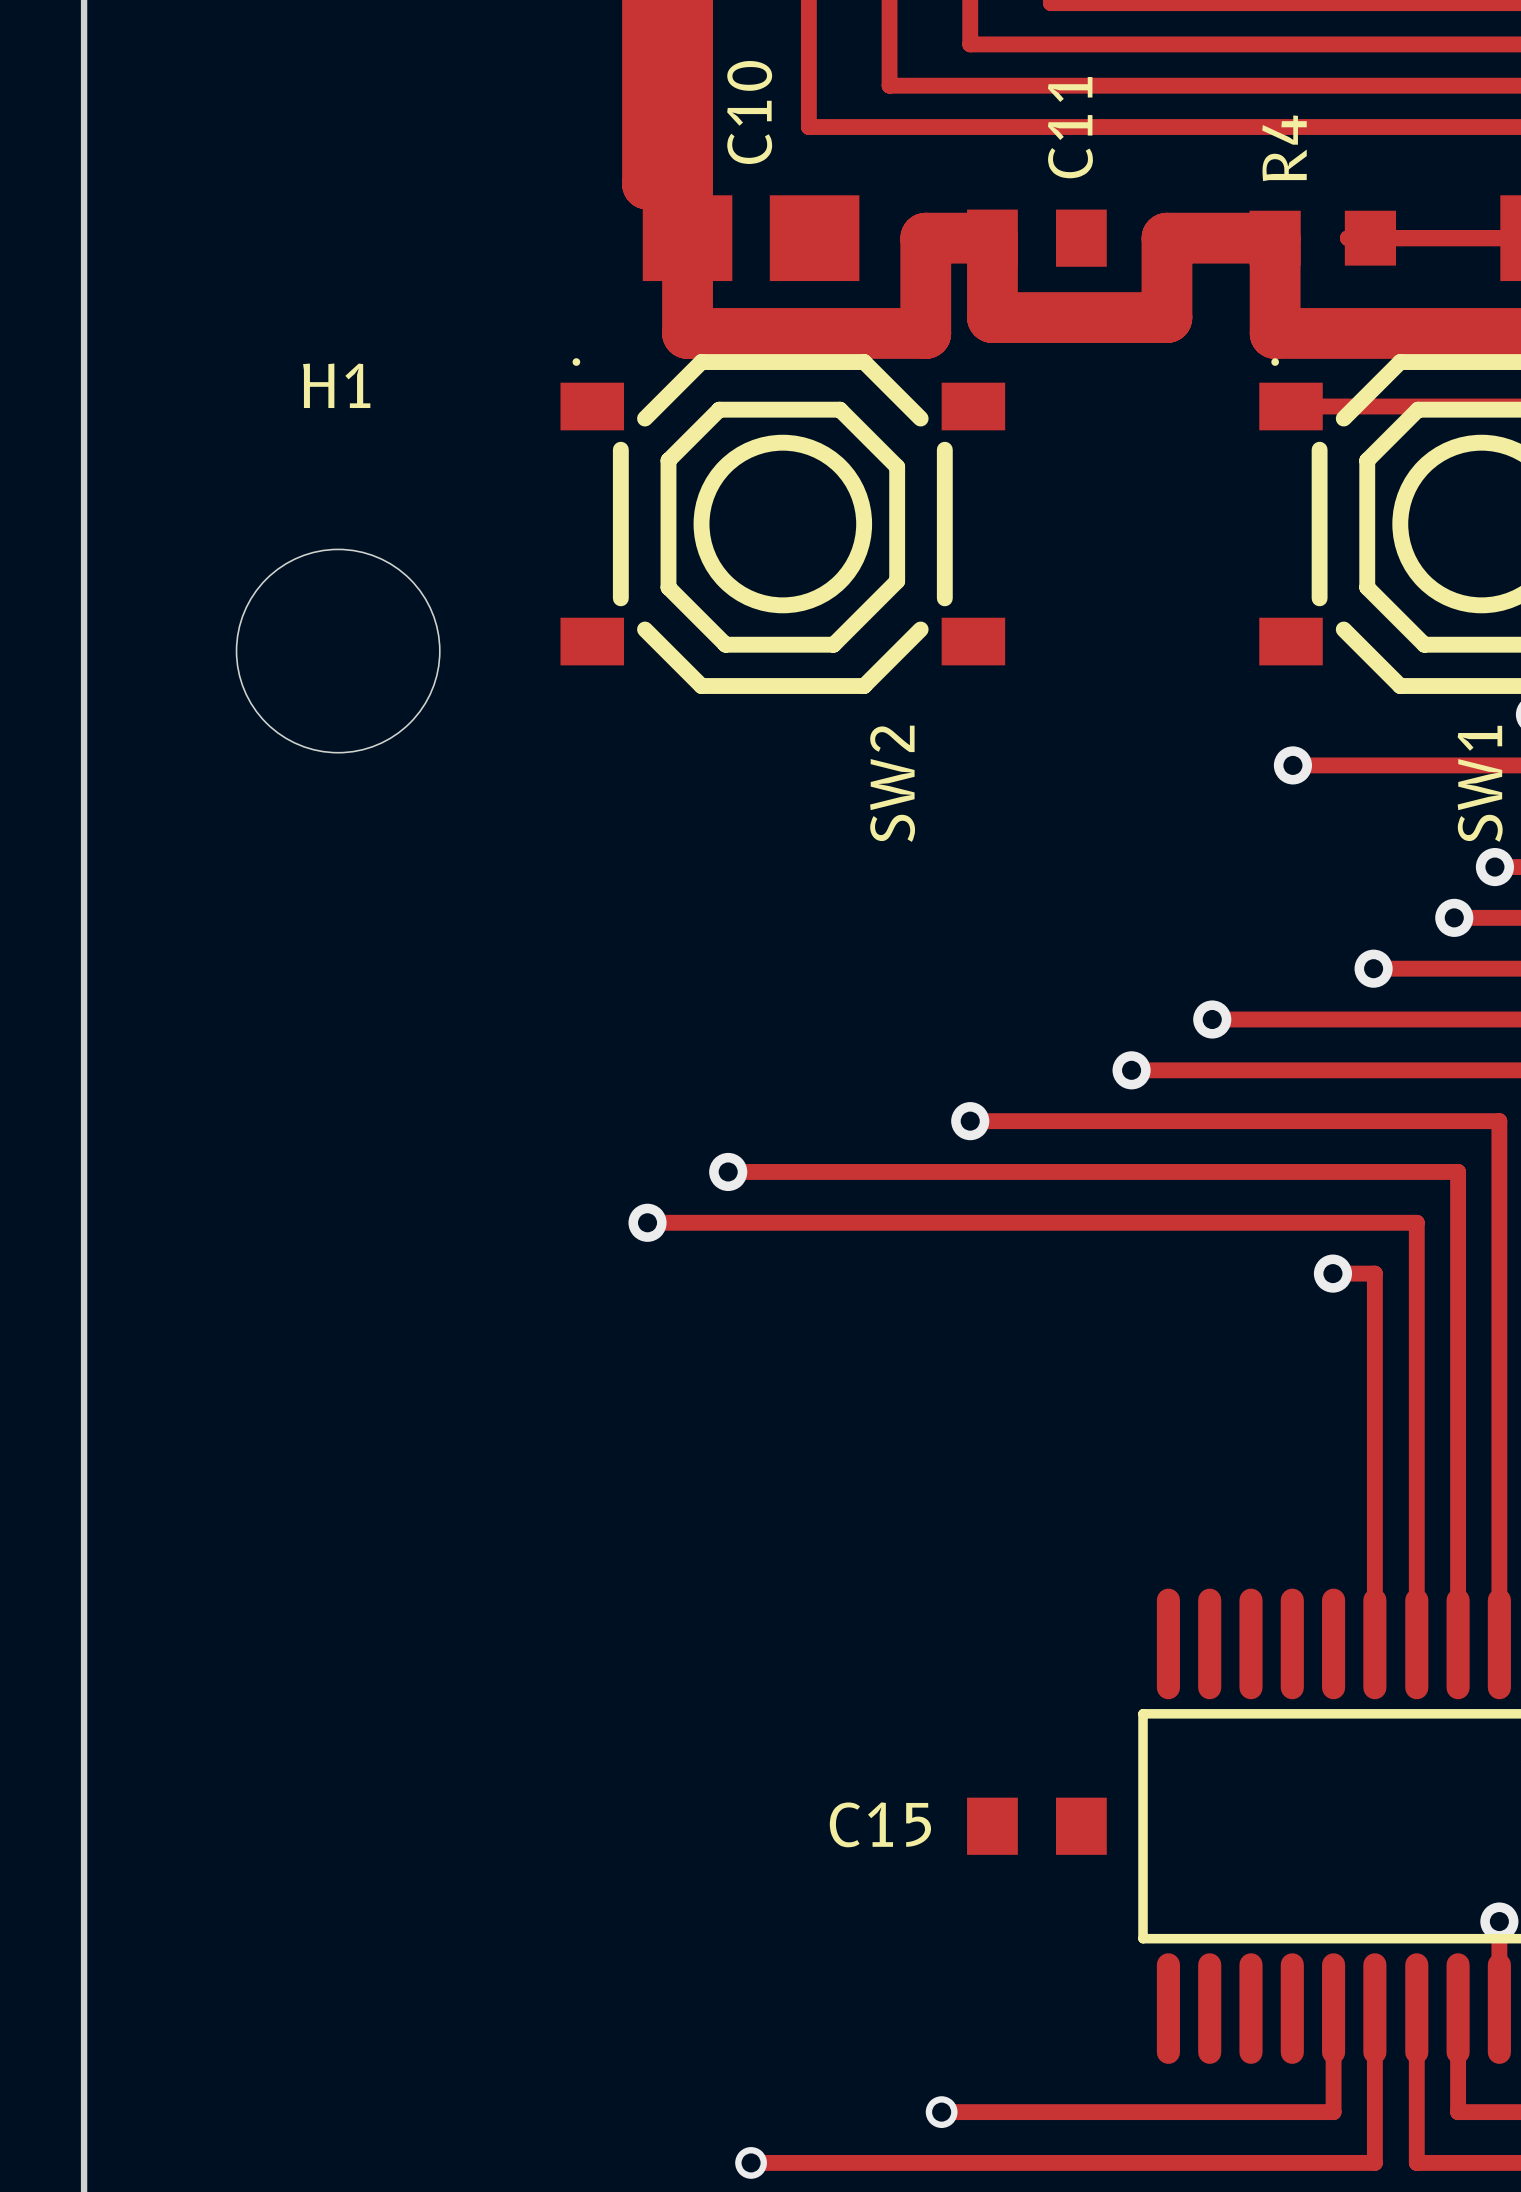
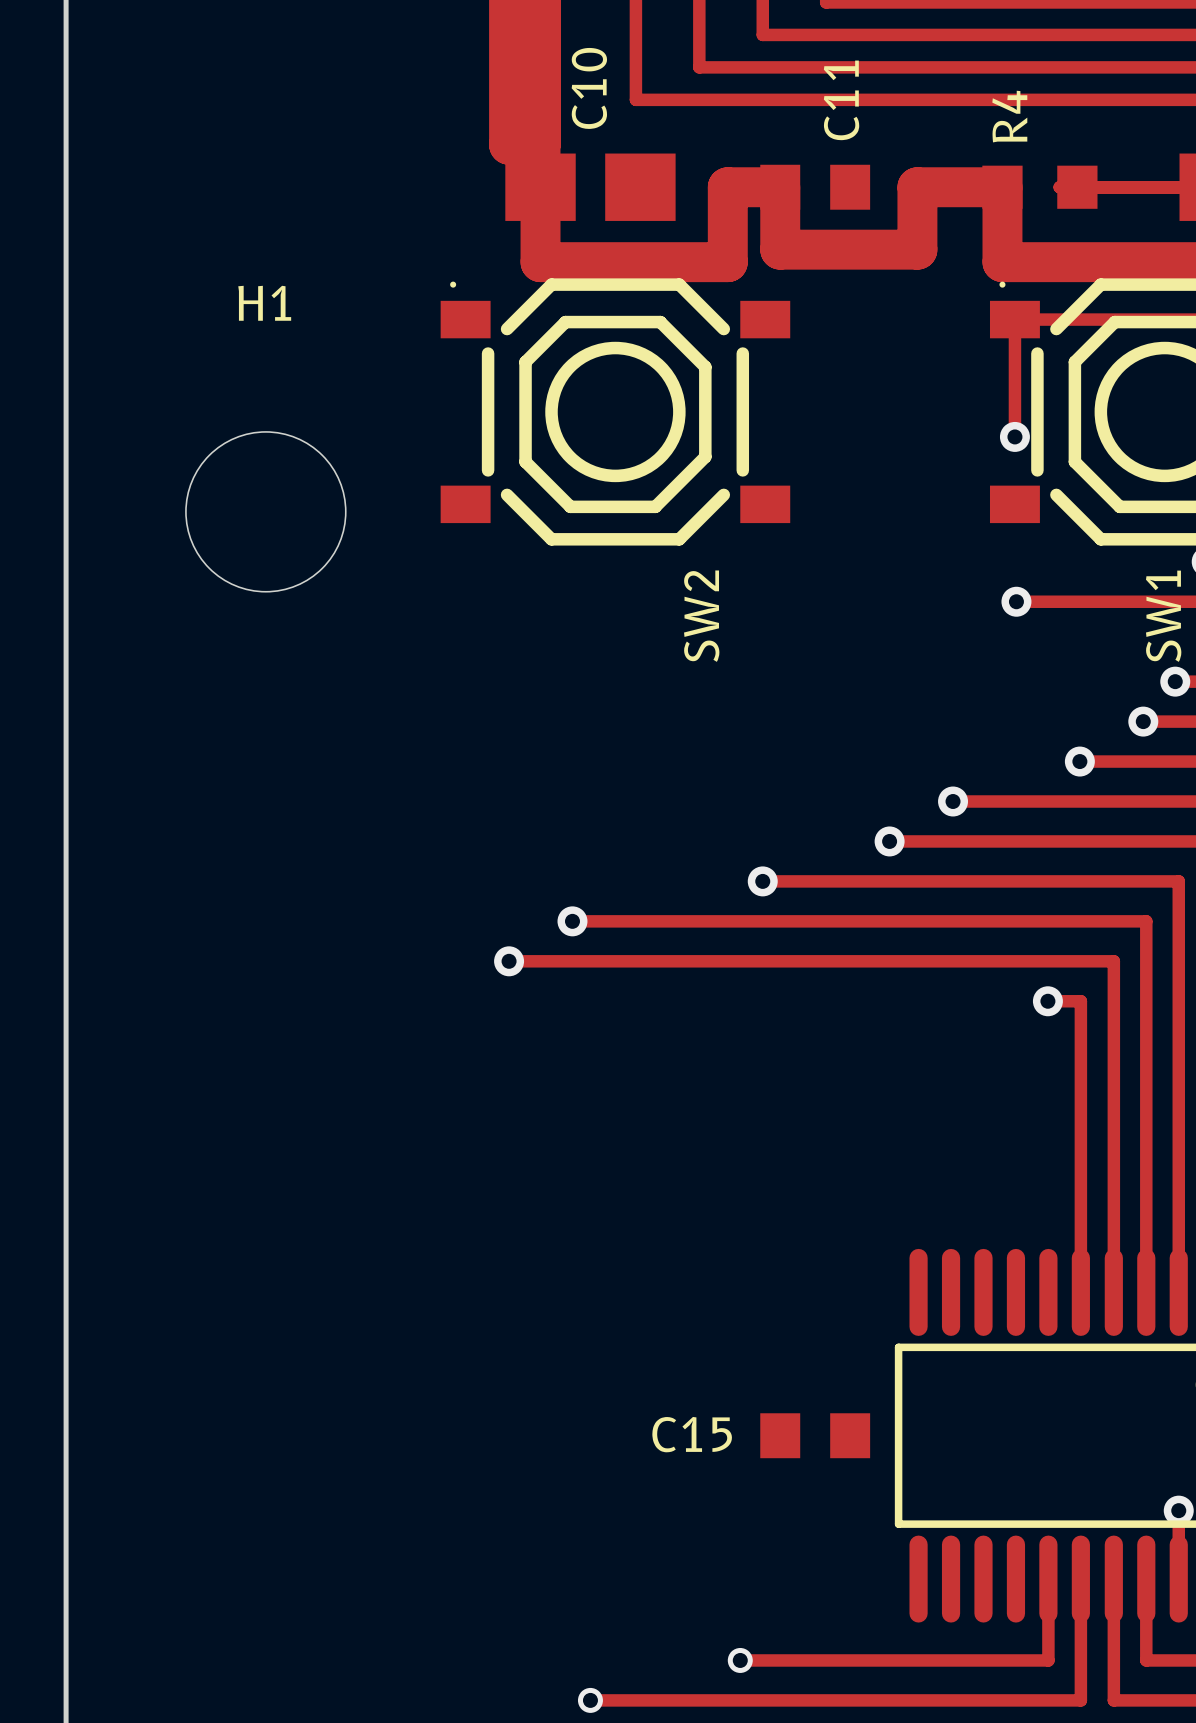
track: none -> (1014, 319) (1014, 436)
via: none -> (1014, 436)

